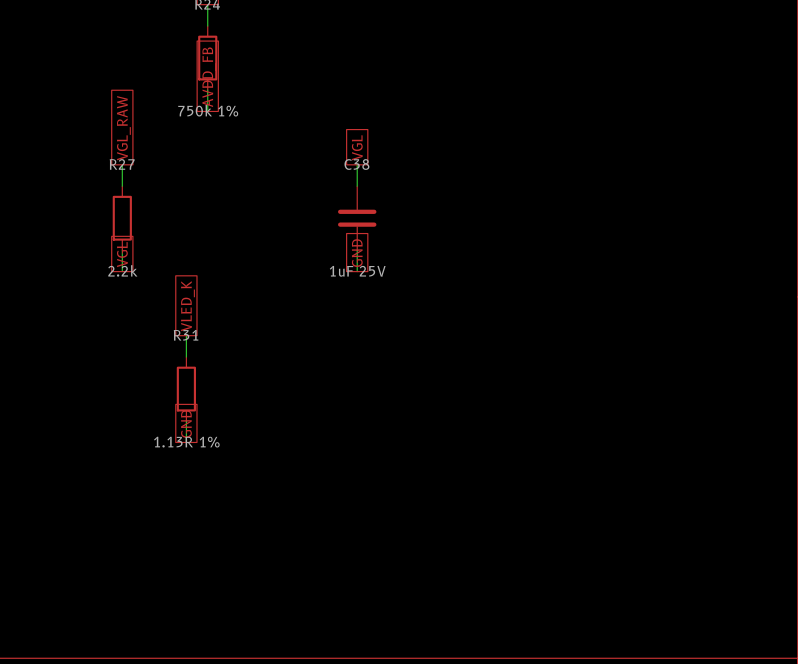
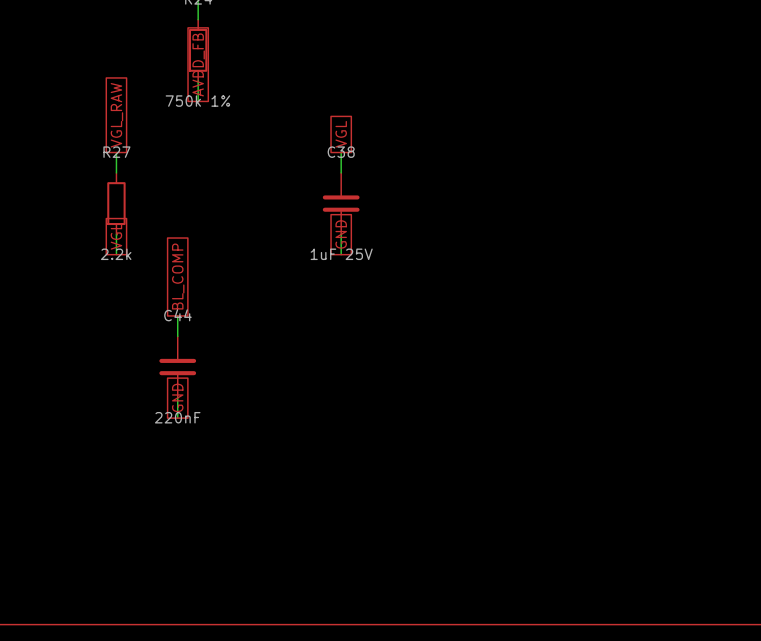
global label: VLED_K (187, 306) -> BL_COMP (178, 276)
R31: 1.13R 1% (186, 389) -> none
C44: none -> 220nF (177, 367)

